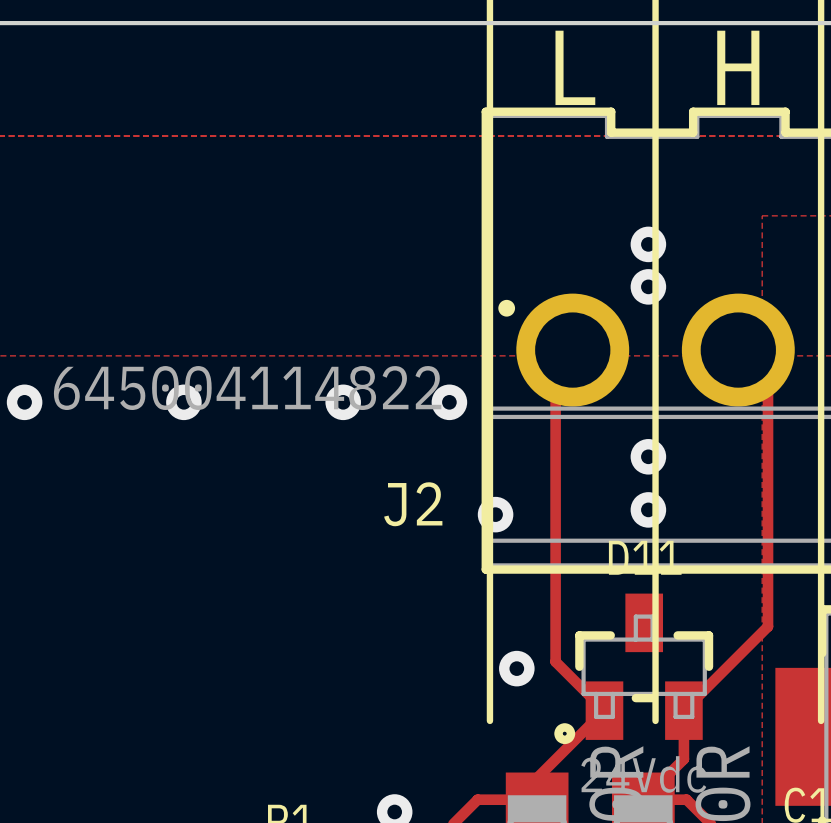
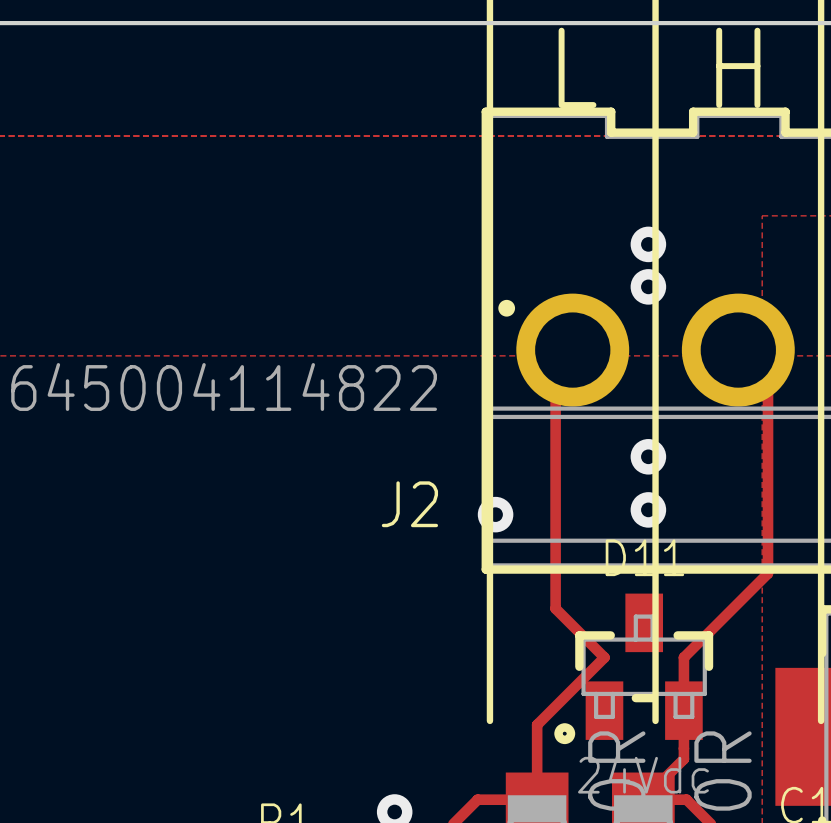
via: (24, 402) -> none
via: (183, 402) -> none
via: (343, 402) -> none
via: (449, 402) -> none
track: (768, 573) (768, 626) (683, 710) -> (768, 573) (683, 657) (683, 710)
track: (555, 608) (555, 661) (604, 710) (537, 777) -> (555, 608) (604, 657) (537, 724) (537, 777)
via: (516, 668) -> none

